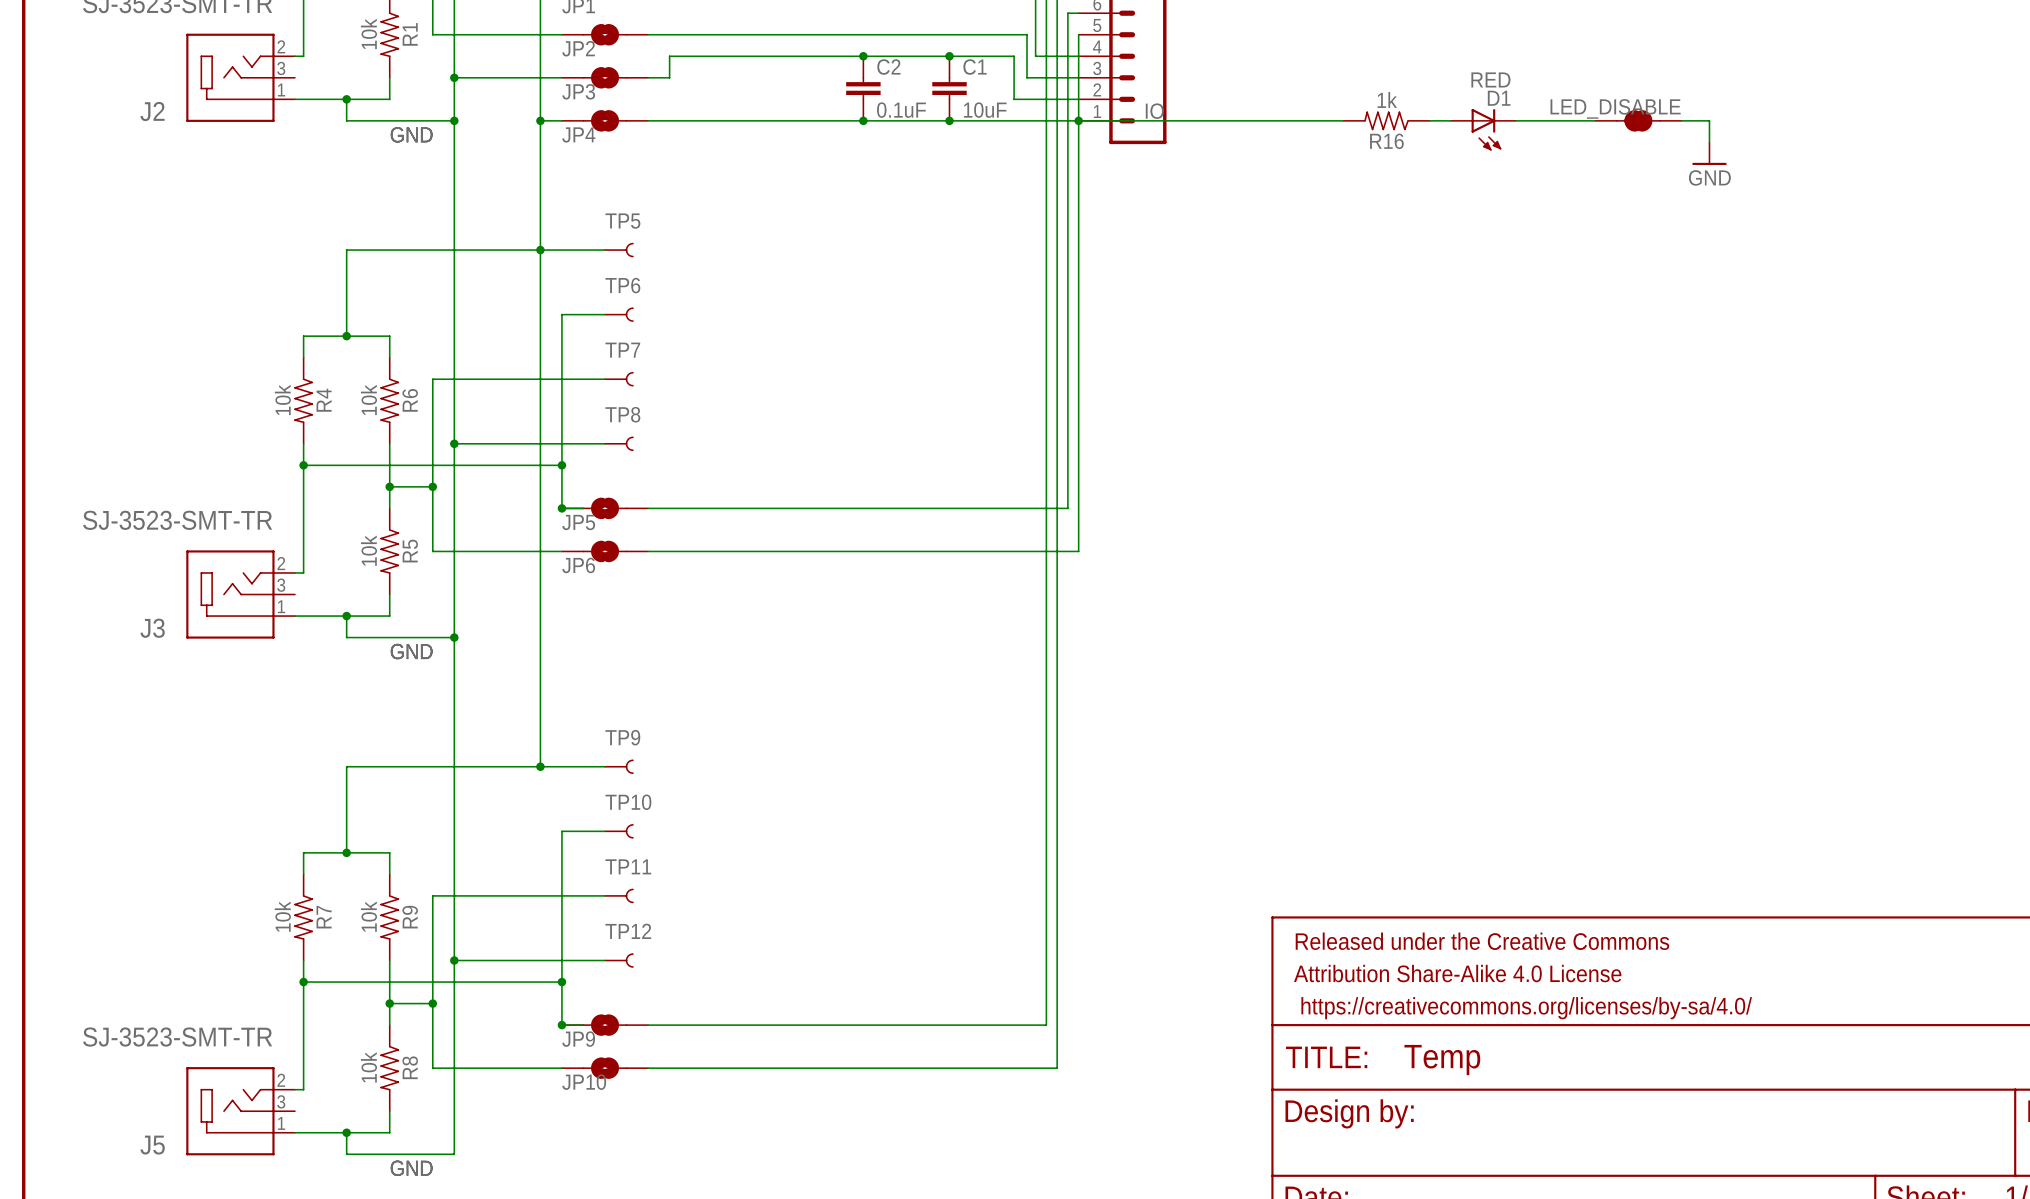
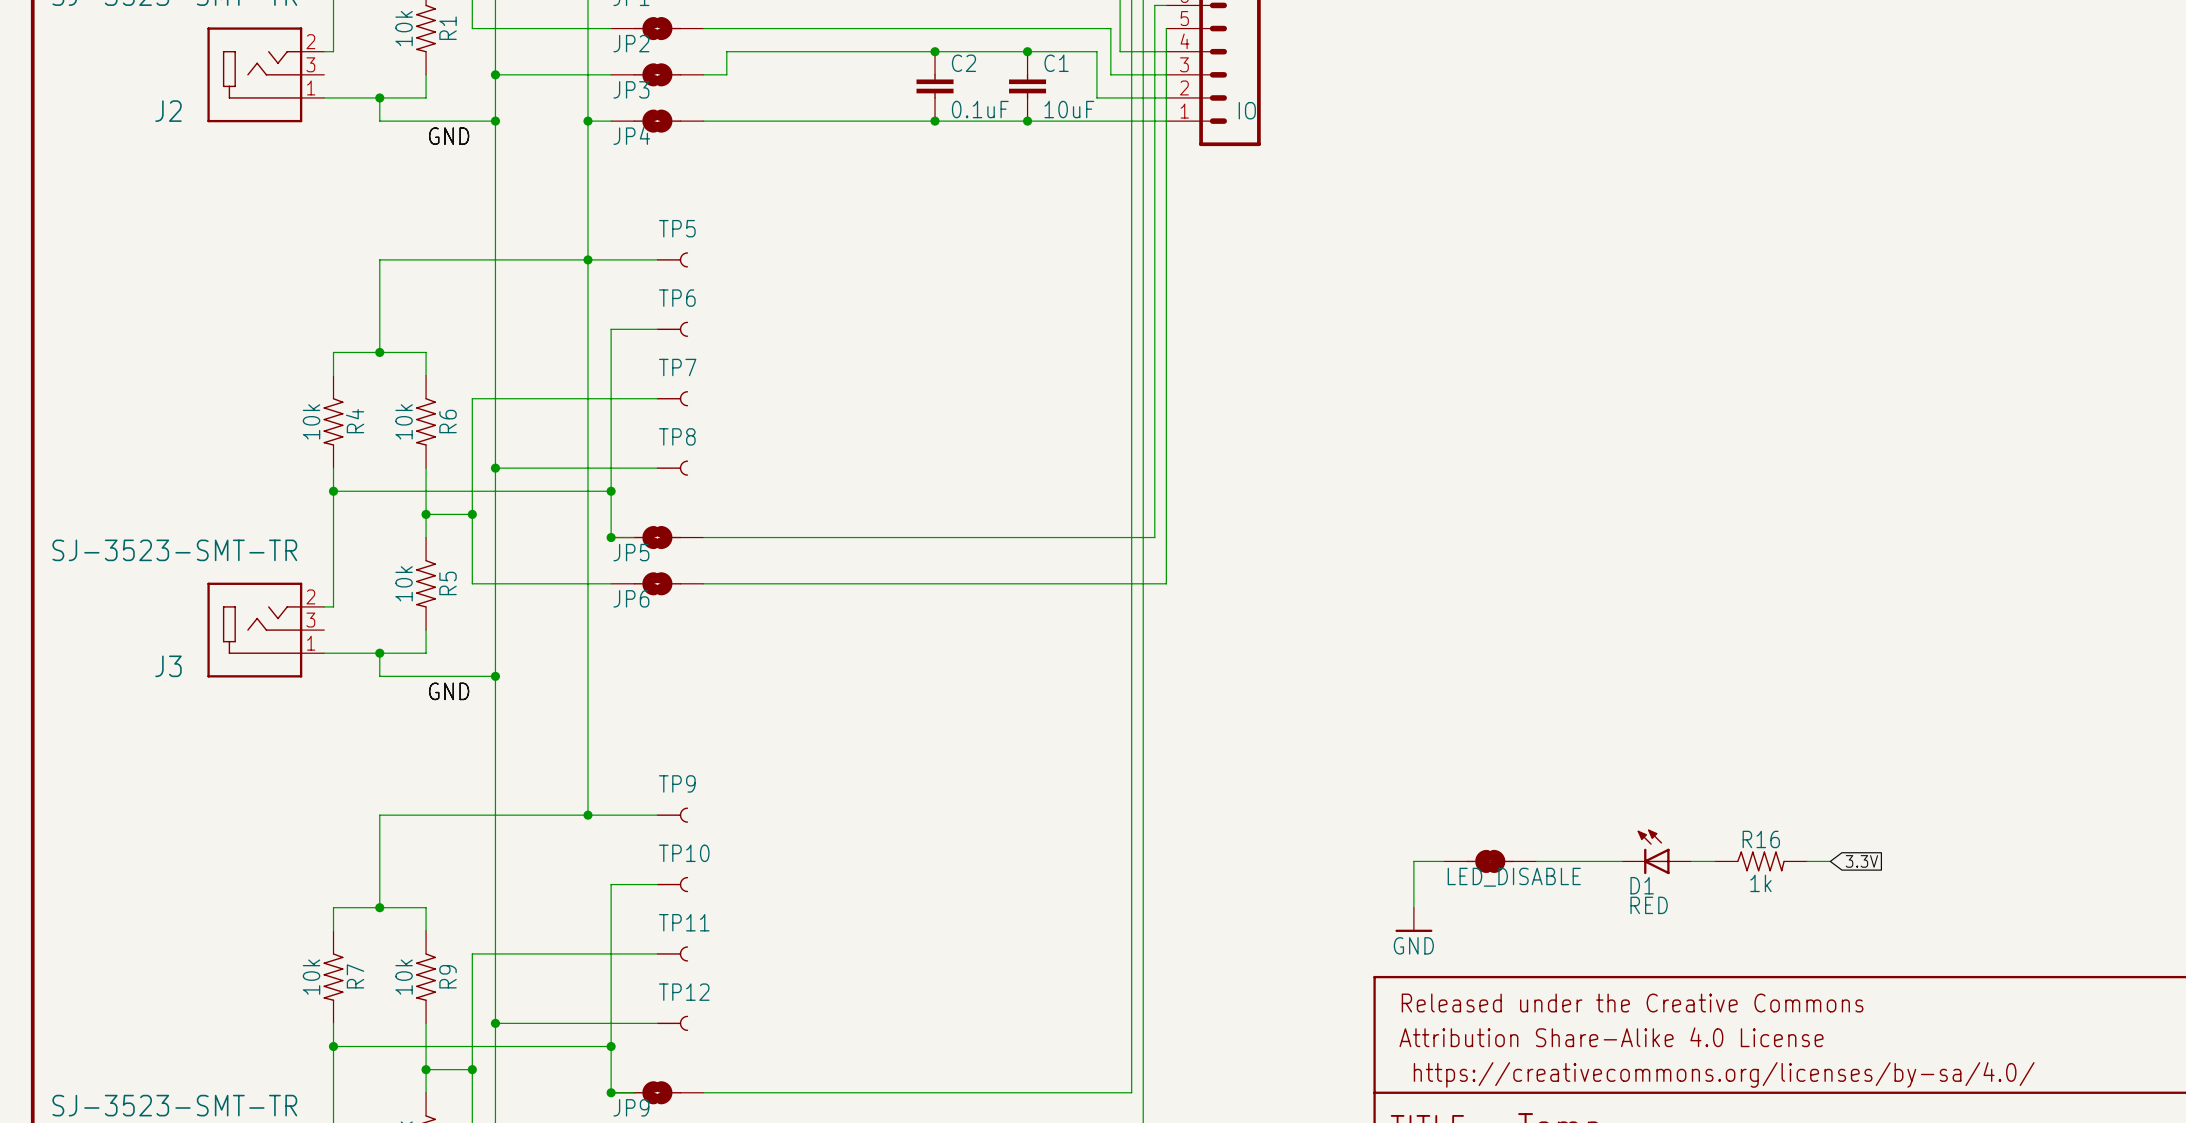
wire: (1078, 120) (1343, 120) -> none
junction: (1078, 120) -> none
R16 rotation: 0° (1386, 120) -> 180° (1760, 861)
R16 position: (1386, 120) -> (1760, 861)
wire: (1429, 120) (1451, 120) -> none
wire: (1515, 120) (1595, 120) -> none
LED_DISABLE: (1638, 120) -> none
wire: (1681, 120) (1709, 120) (1709, 142) -> none
D1 position: (1483, 129) -> (1656, 851)
D1 rotation: 0° (1486, 129) -> 180° (1653, 851)
power symbol: GND (1709, 153) -> none
wire: none -> (1443, 861) (1413, 861) (1413, 907)
LED_DISABLE: none -> (1490, 861)
wire: none -> (1536, 861) (1622, 861)
wire: none -> (1691, 861) (1714, 861)
wire: none -> (1807, 861) (1830, 861)
global label: none -> 3.3V (1861, 861)
power symbol: none -> GND (1413, 919)

